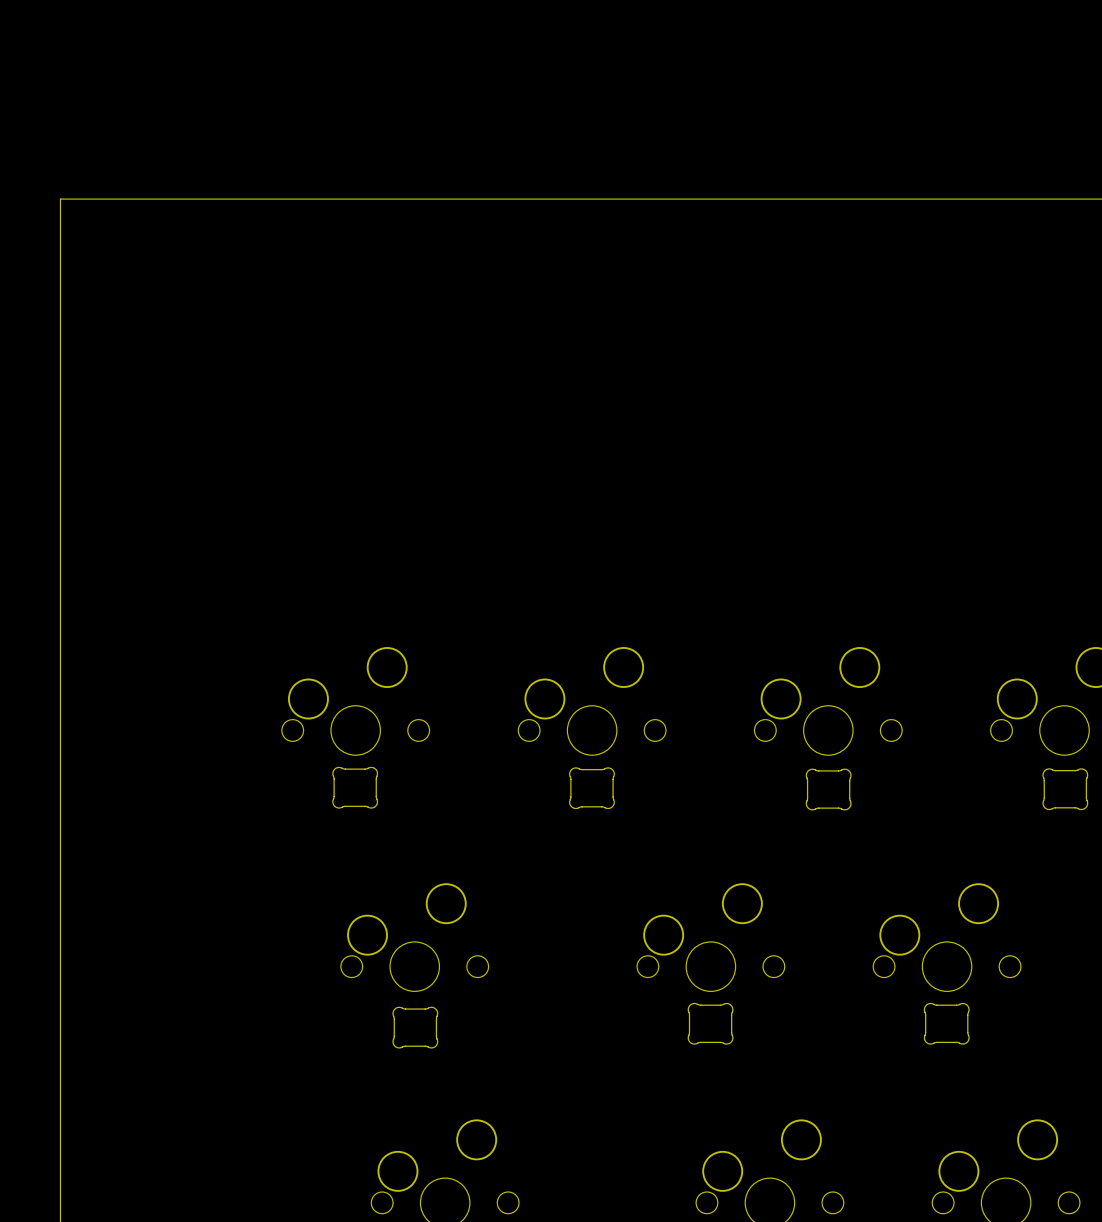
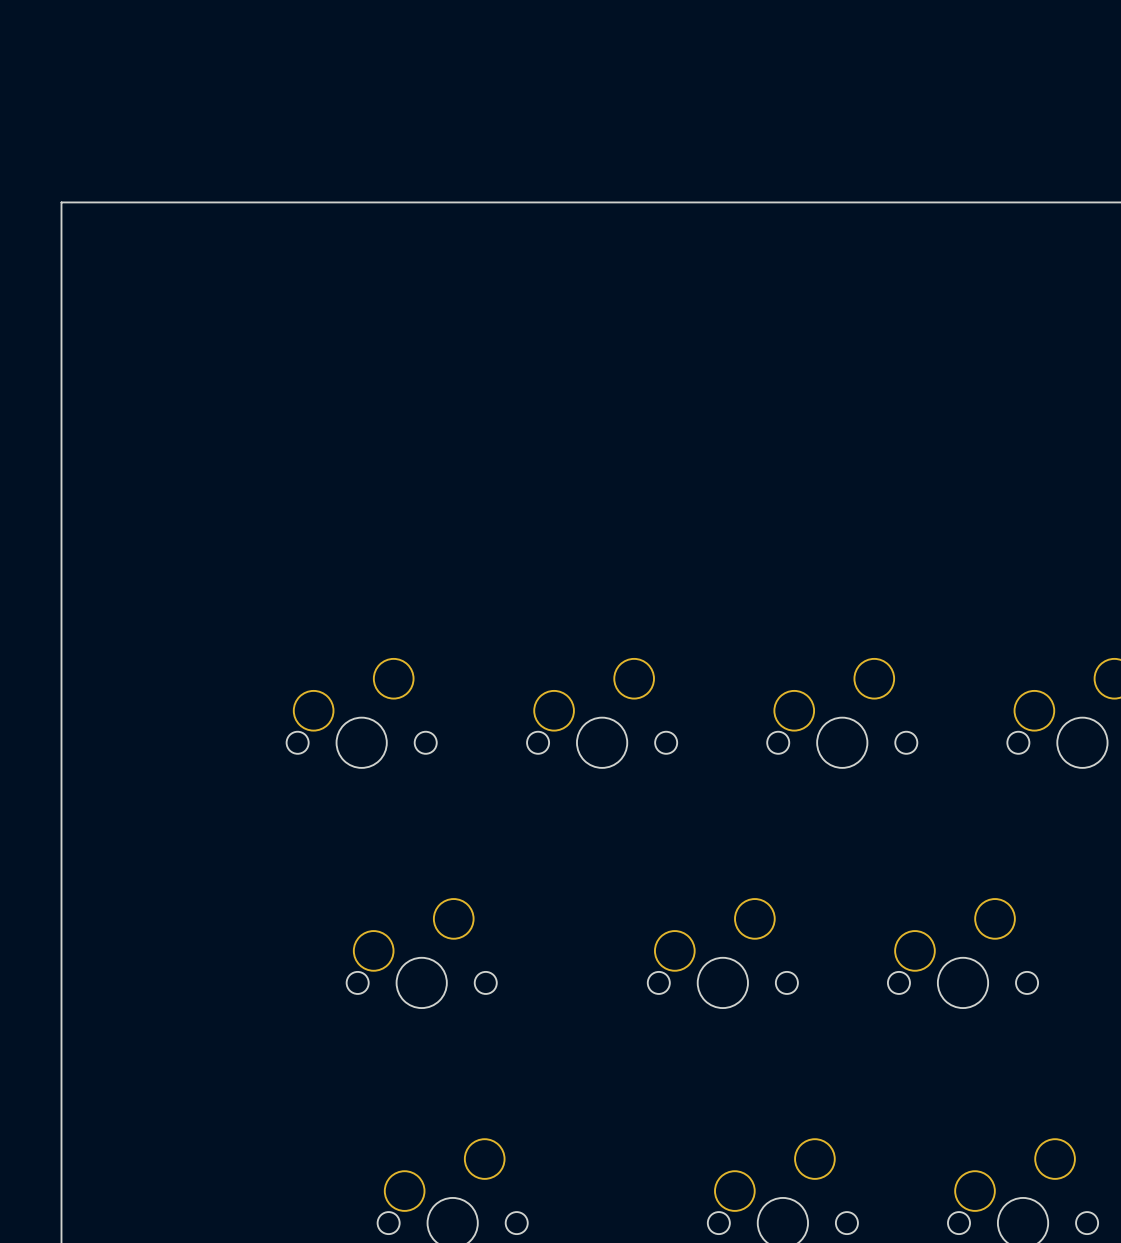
part: (355, 787) -> none
part: (591, 788) -> none
part: (828, 789) -> none
part: (1065, 789) -> none
part: (710, 1023) -> none
part: (946, 1023) -> none
part: (415, 1027) -> none

